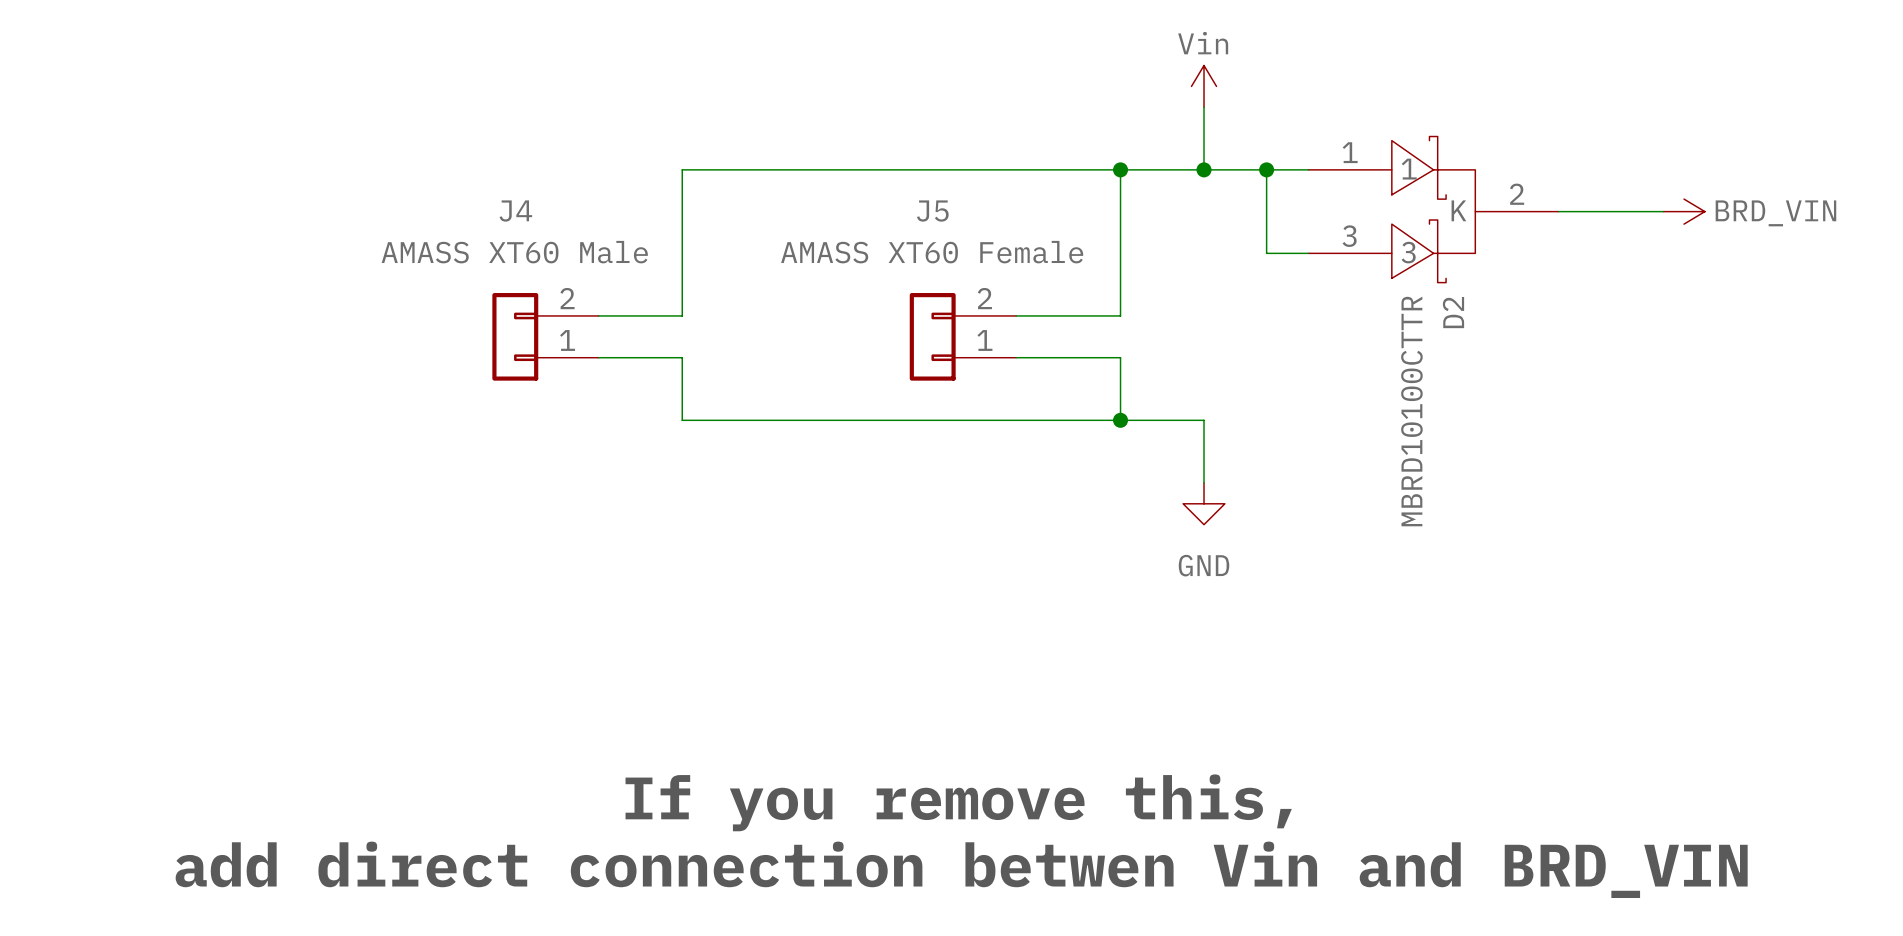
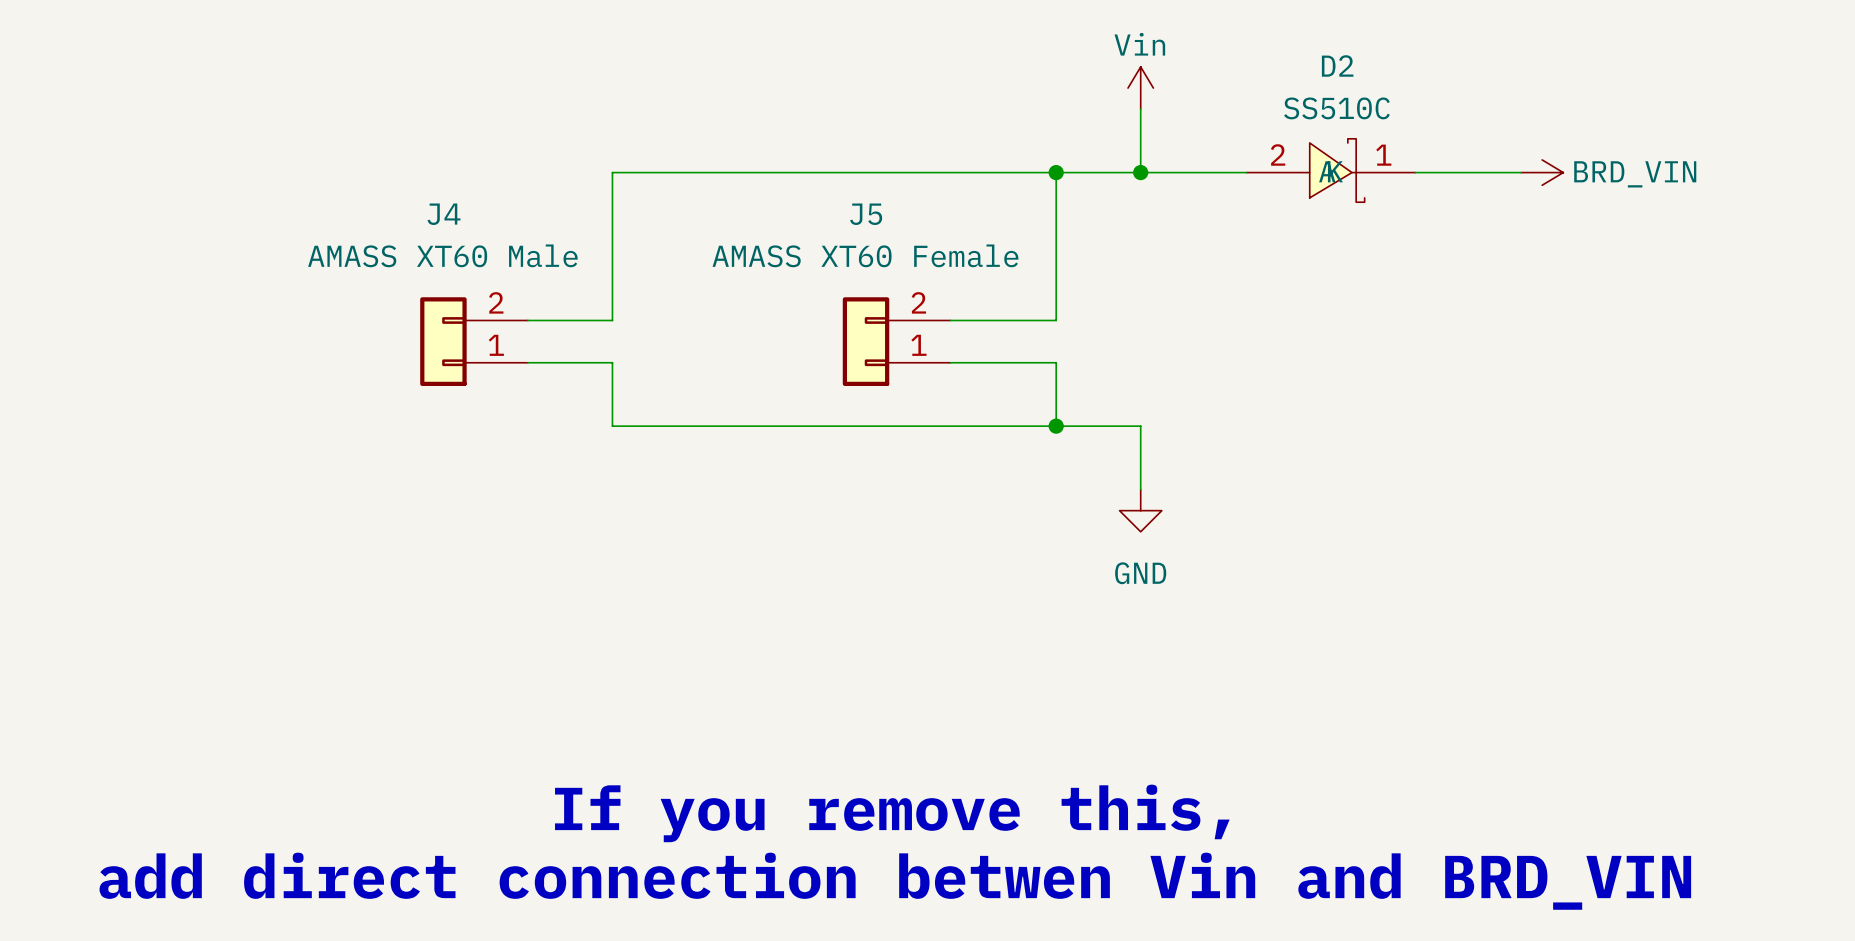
D2 symbol: [1308, 136, 1559, 283] -> [1246, 138, 1416, 203]
wire: (1266, 169) (1266, 253) (1308, 253) -> none
junction: (1266, 169) -> none
wire: (1558, 211) (1663, 211) -> (1415, 172) (1521, 172)
power symbol position: BRD_VIN (1684, 211) -> BRD_VIN (1542, 172)
D2 name position: D2 (1453, 312) -> D2 (1337, 65)
D2 value: MBRD10100CTTR (1411, 411) -> SS510C (1336, 108)

